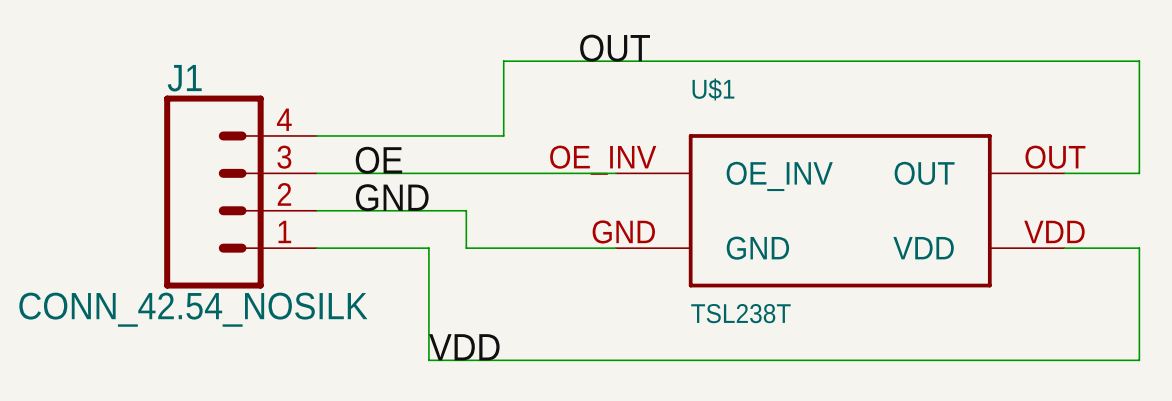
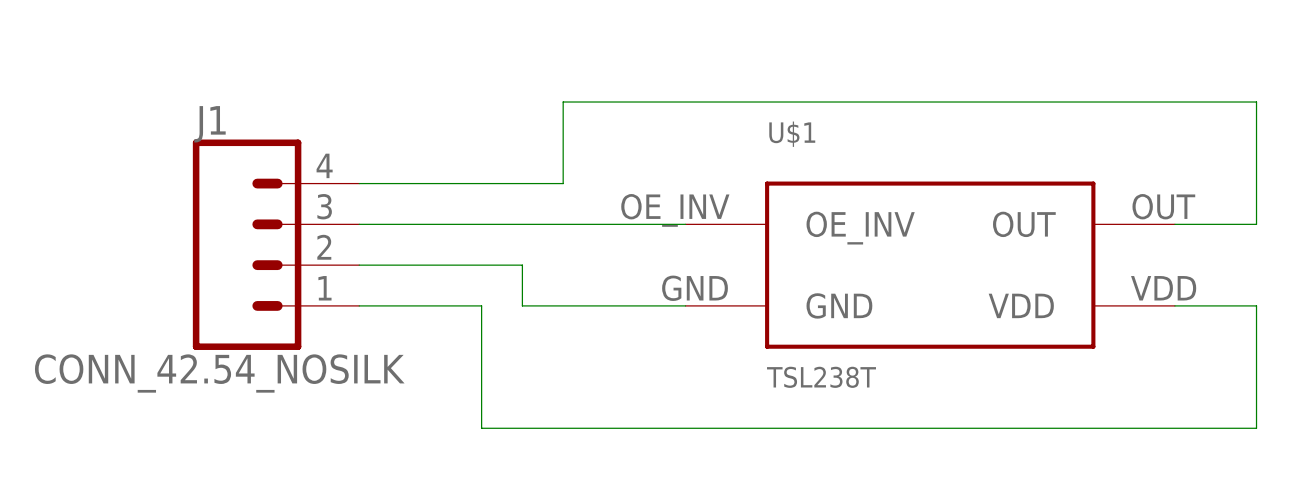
label: OUT (615, 48) -> none
label: OE (378, 160) -> none
label: GND (392, 197) -> none
label: VDD (464, 347) -> none

